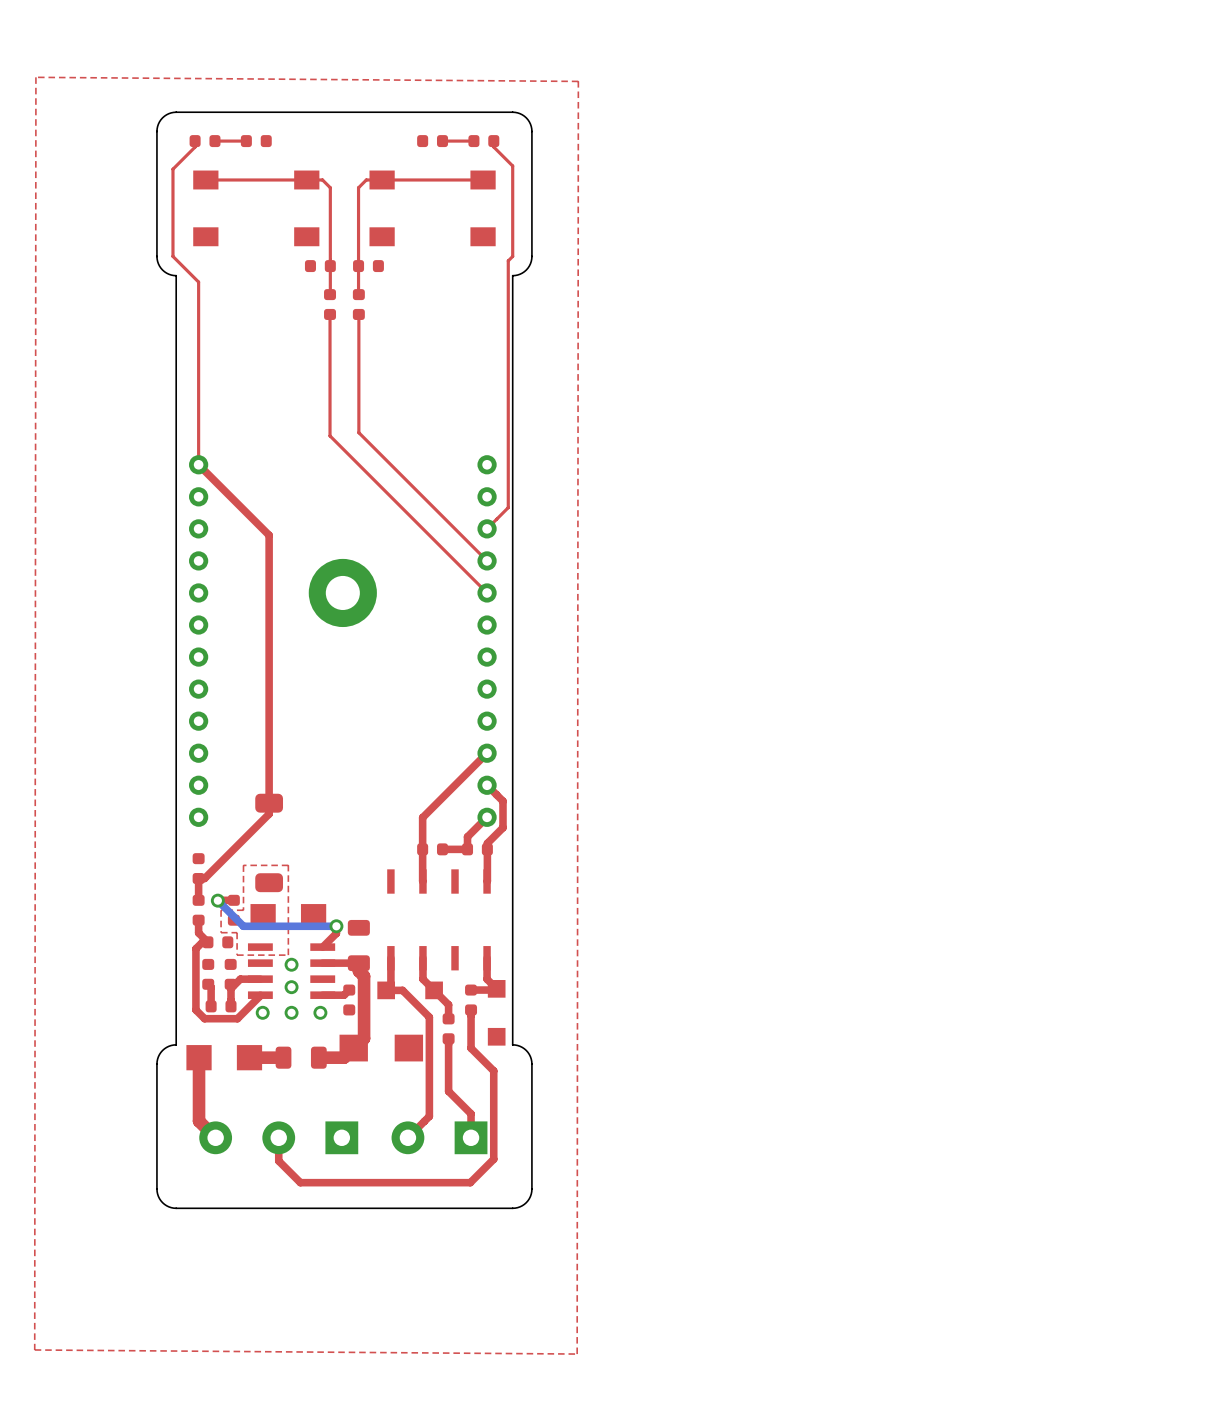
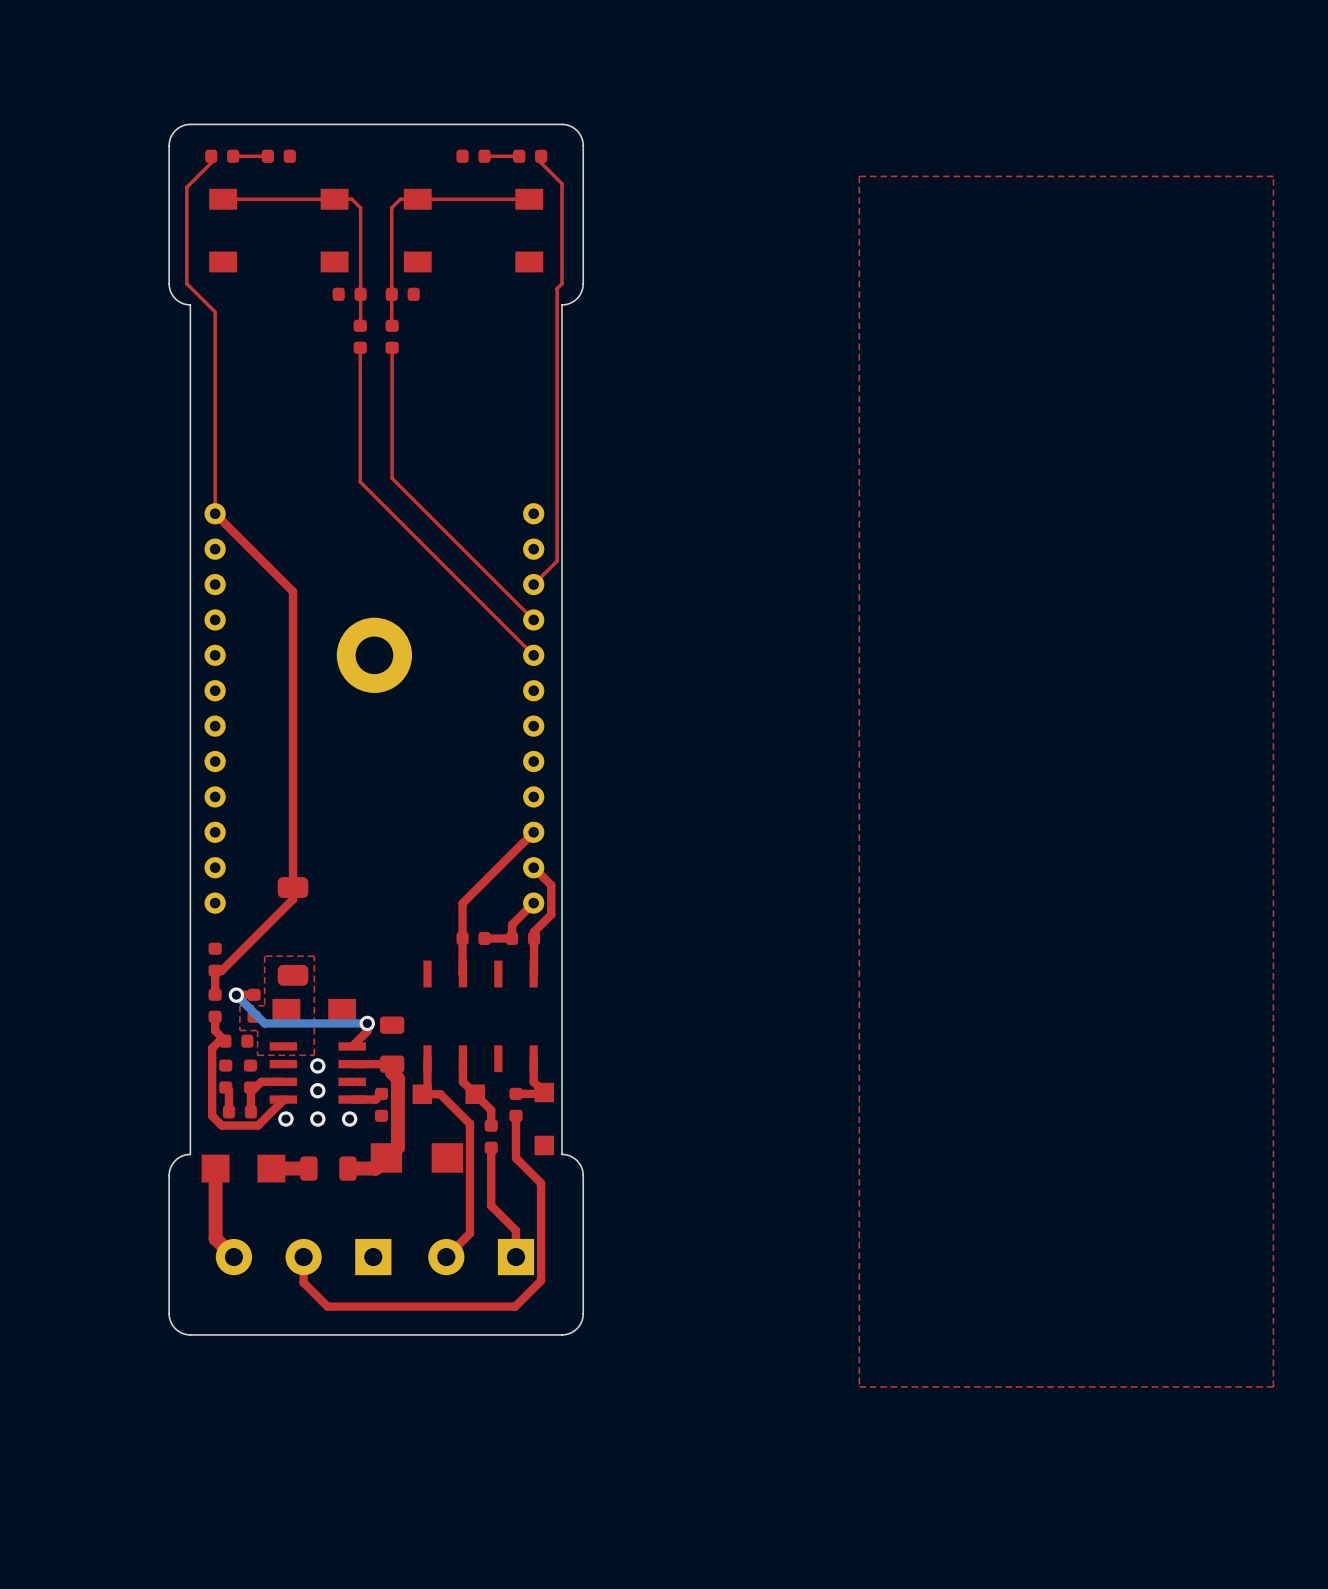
top zone outline: (35, 77) (578, 81) (577, 1354) (34, 1349) (35, 77) -> none
top zone outline: none -> (1273, 176) (1273, 1386) (859, 1386) (859, 176) (1273, 176)

